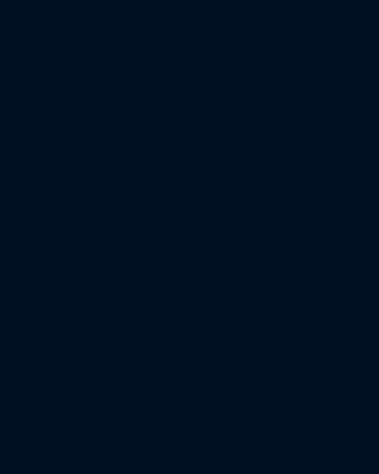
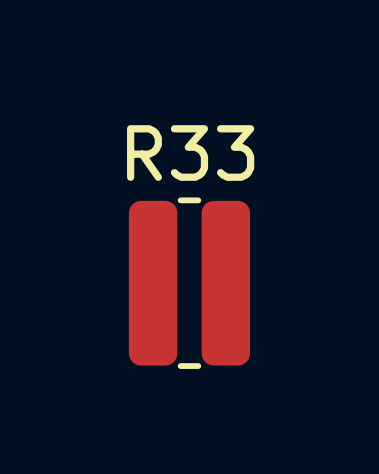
R33: none -> (189, 283)

